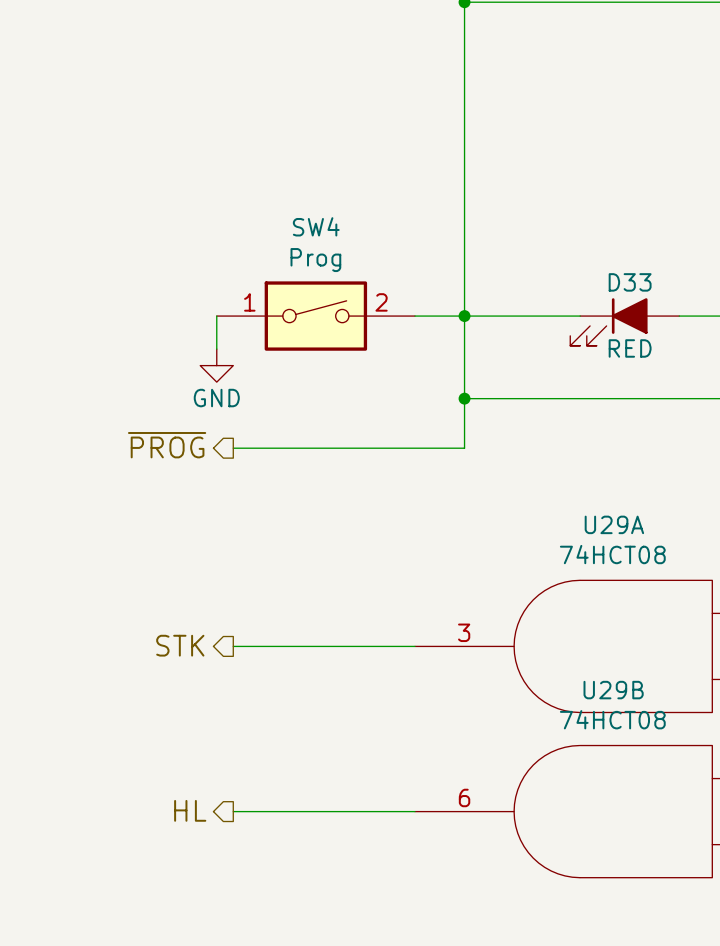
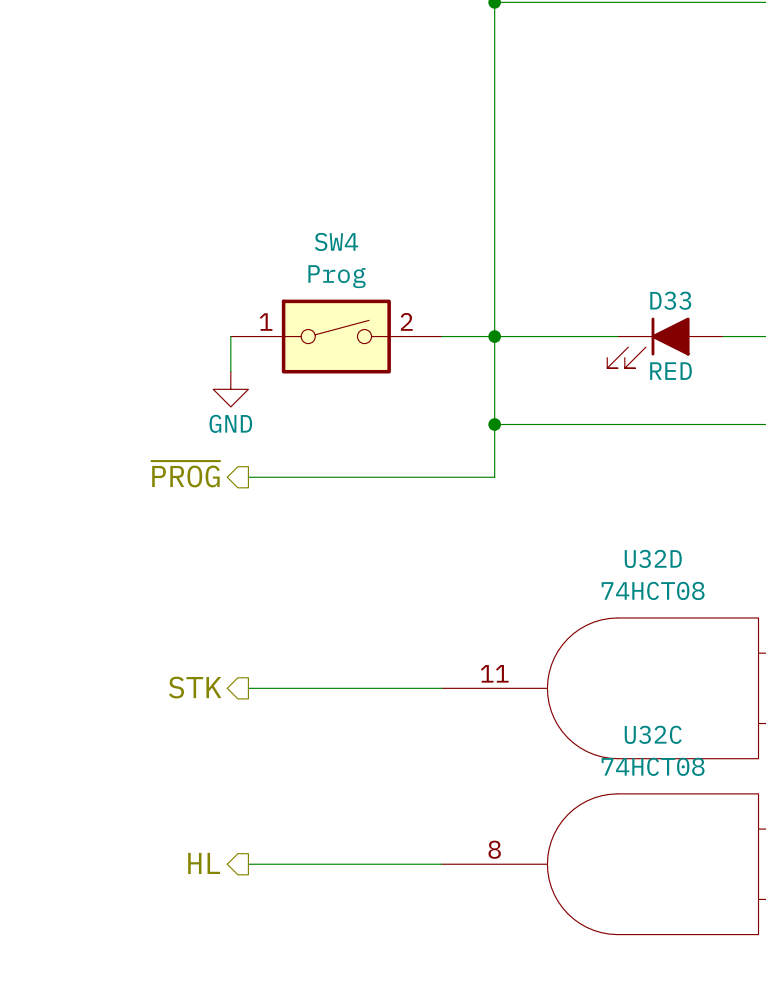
U29A name: U29A (614, 524) -> U32D (653, 558)
U29A pin number: 3 (464, 632) -> 11 (494, 673)
U29B name: U29B (613, 690) -> U32C (653, 734)
U29B pin number: 6 (464, 797) -> 8 (494, 849)

